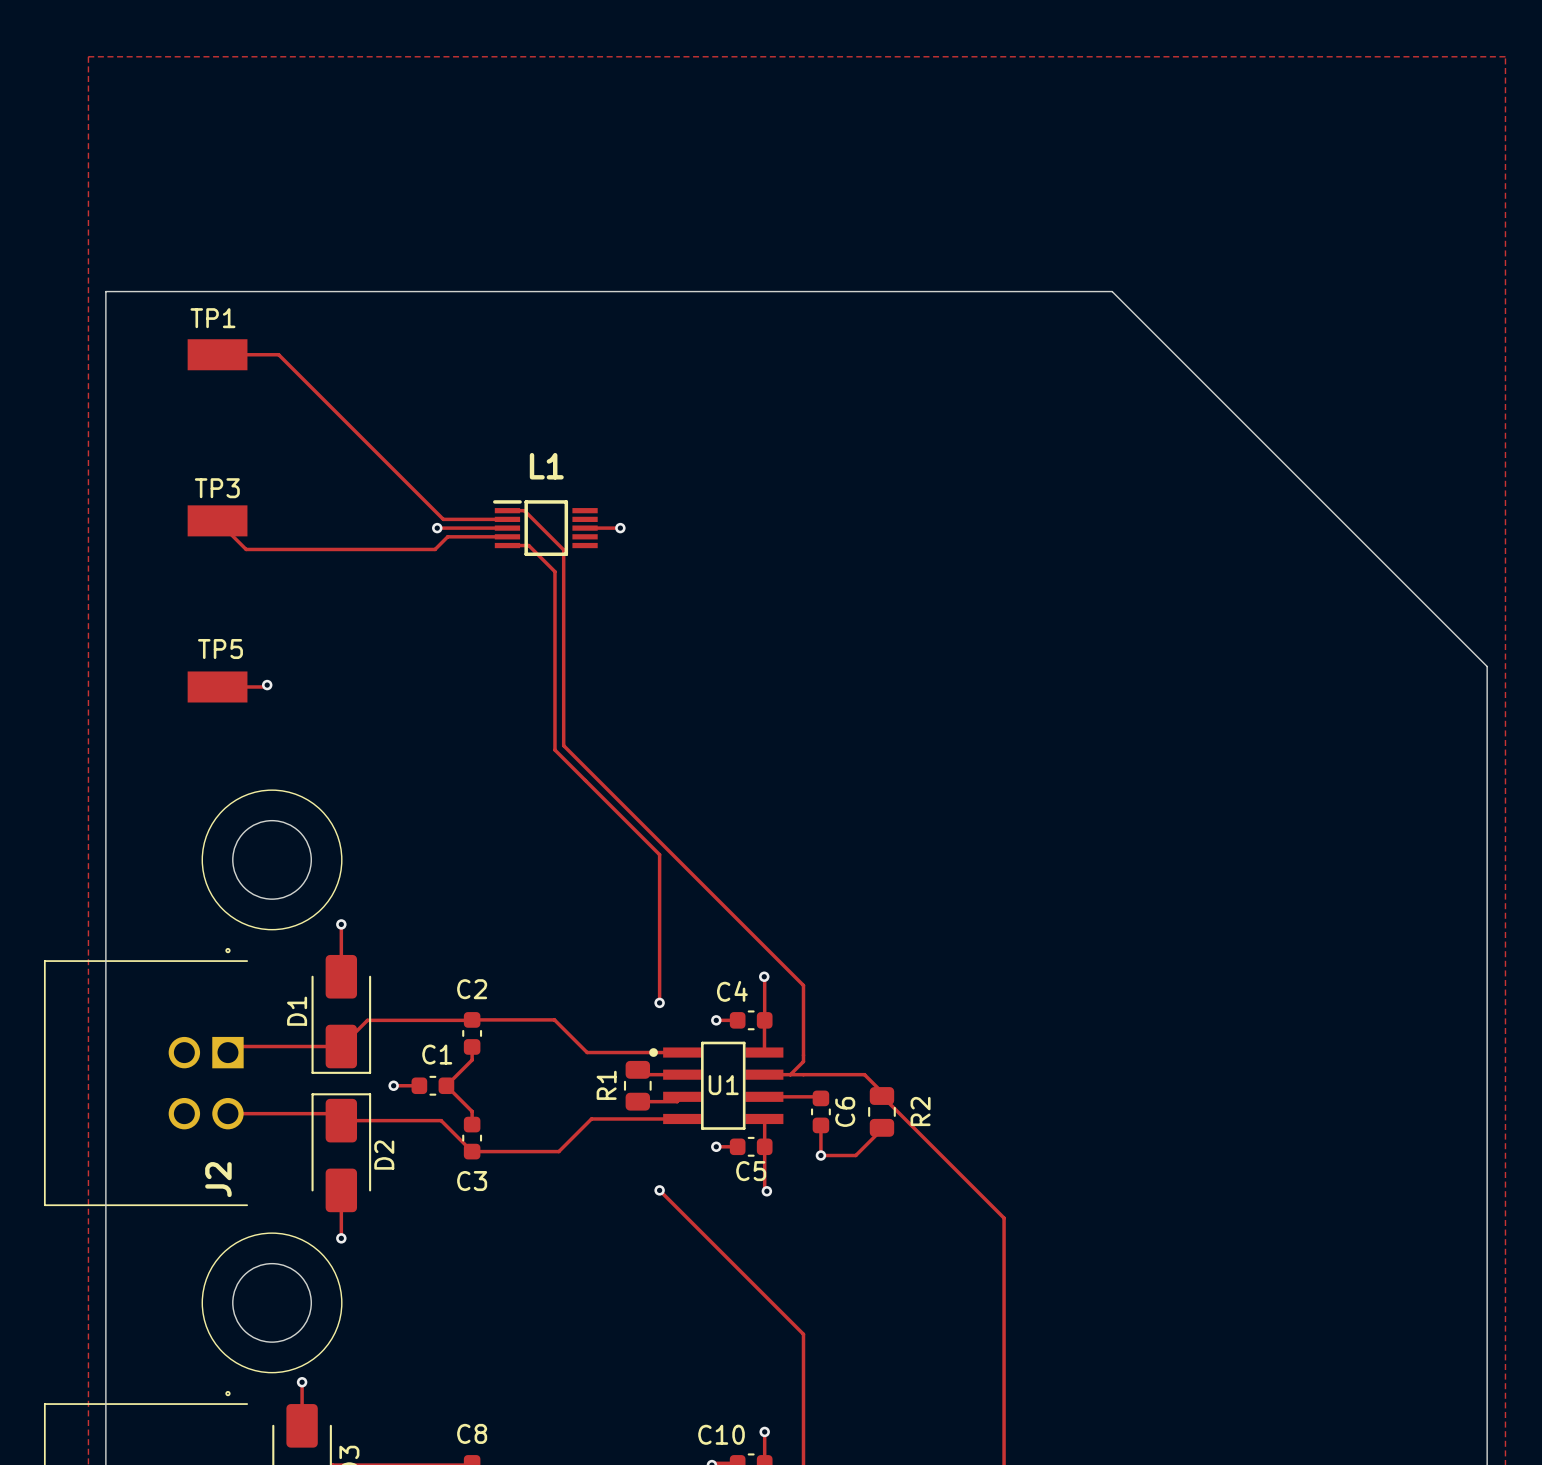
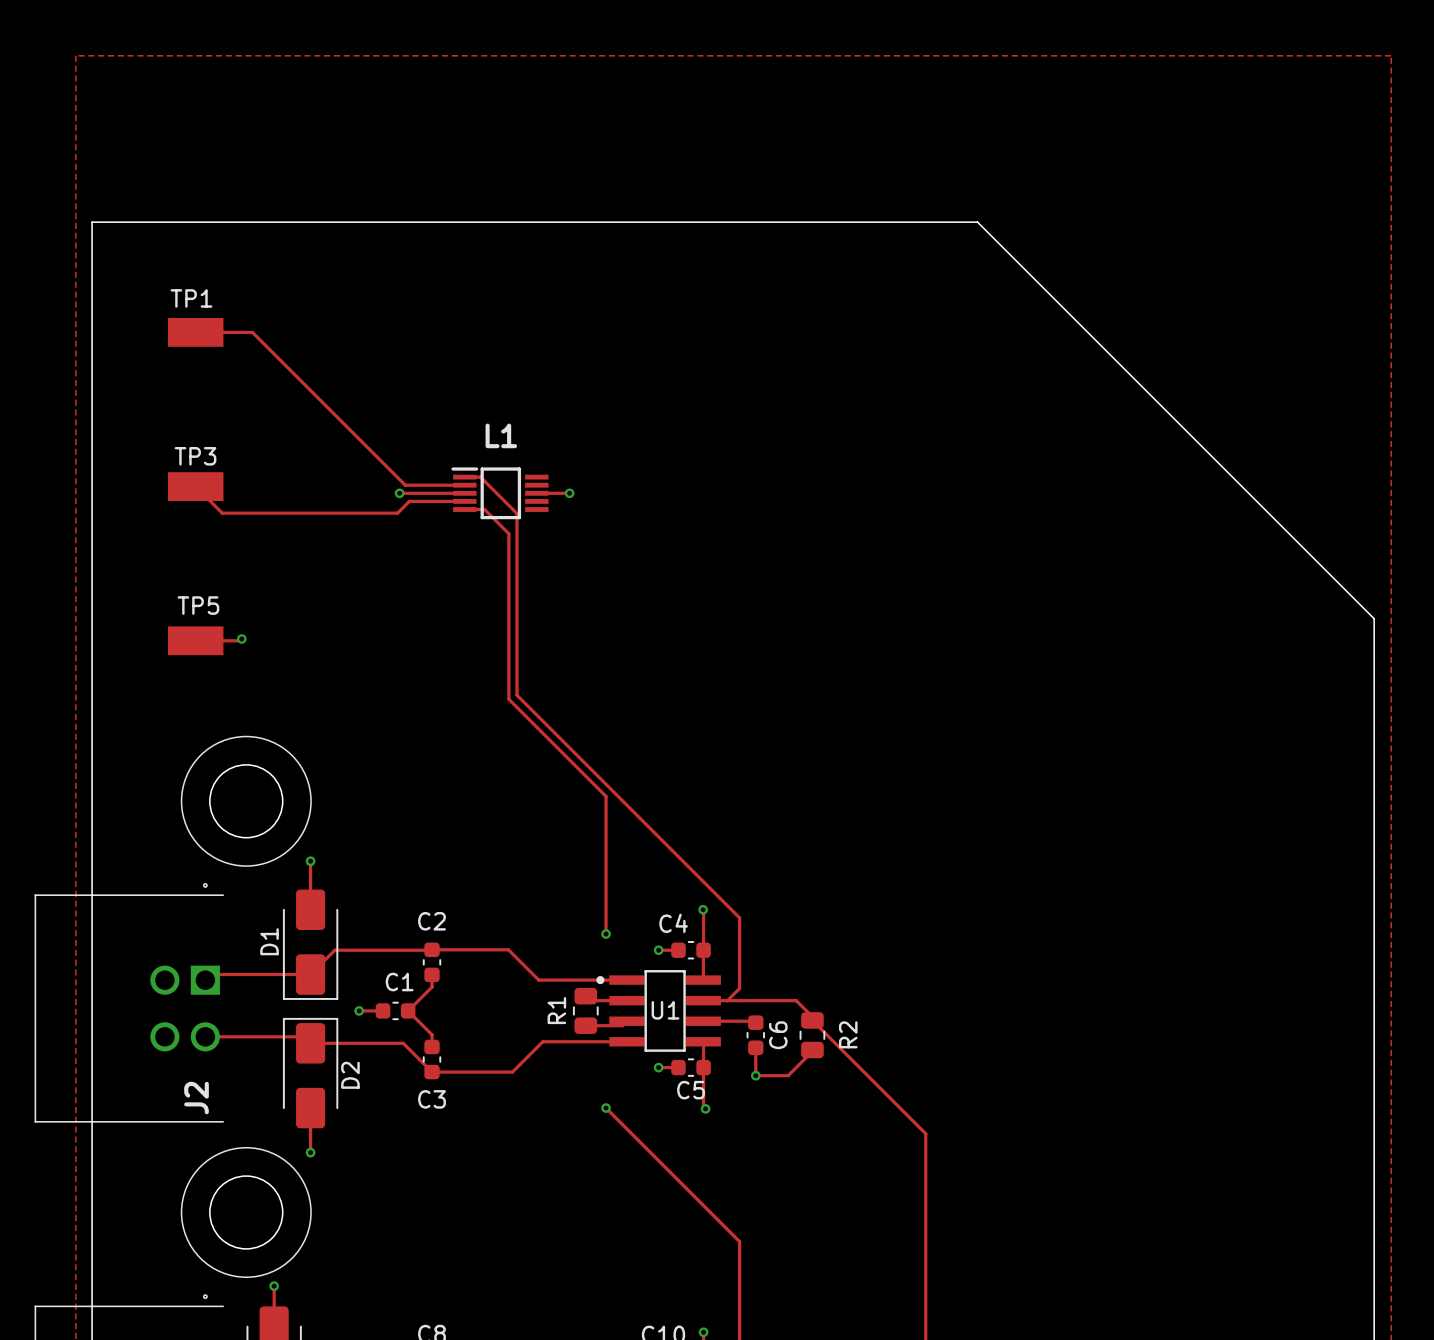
board edge: (105, 291) (1112, 291) (1487, 666) -> (92, 273) (92, 222) (977, 222) (1374, 618) (1374, 621)

